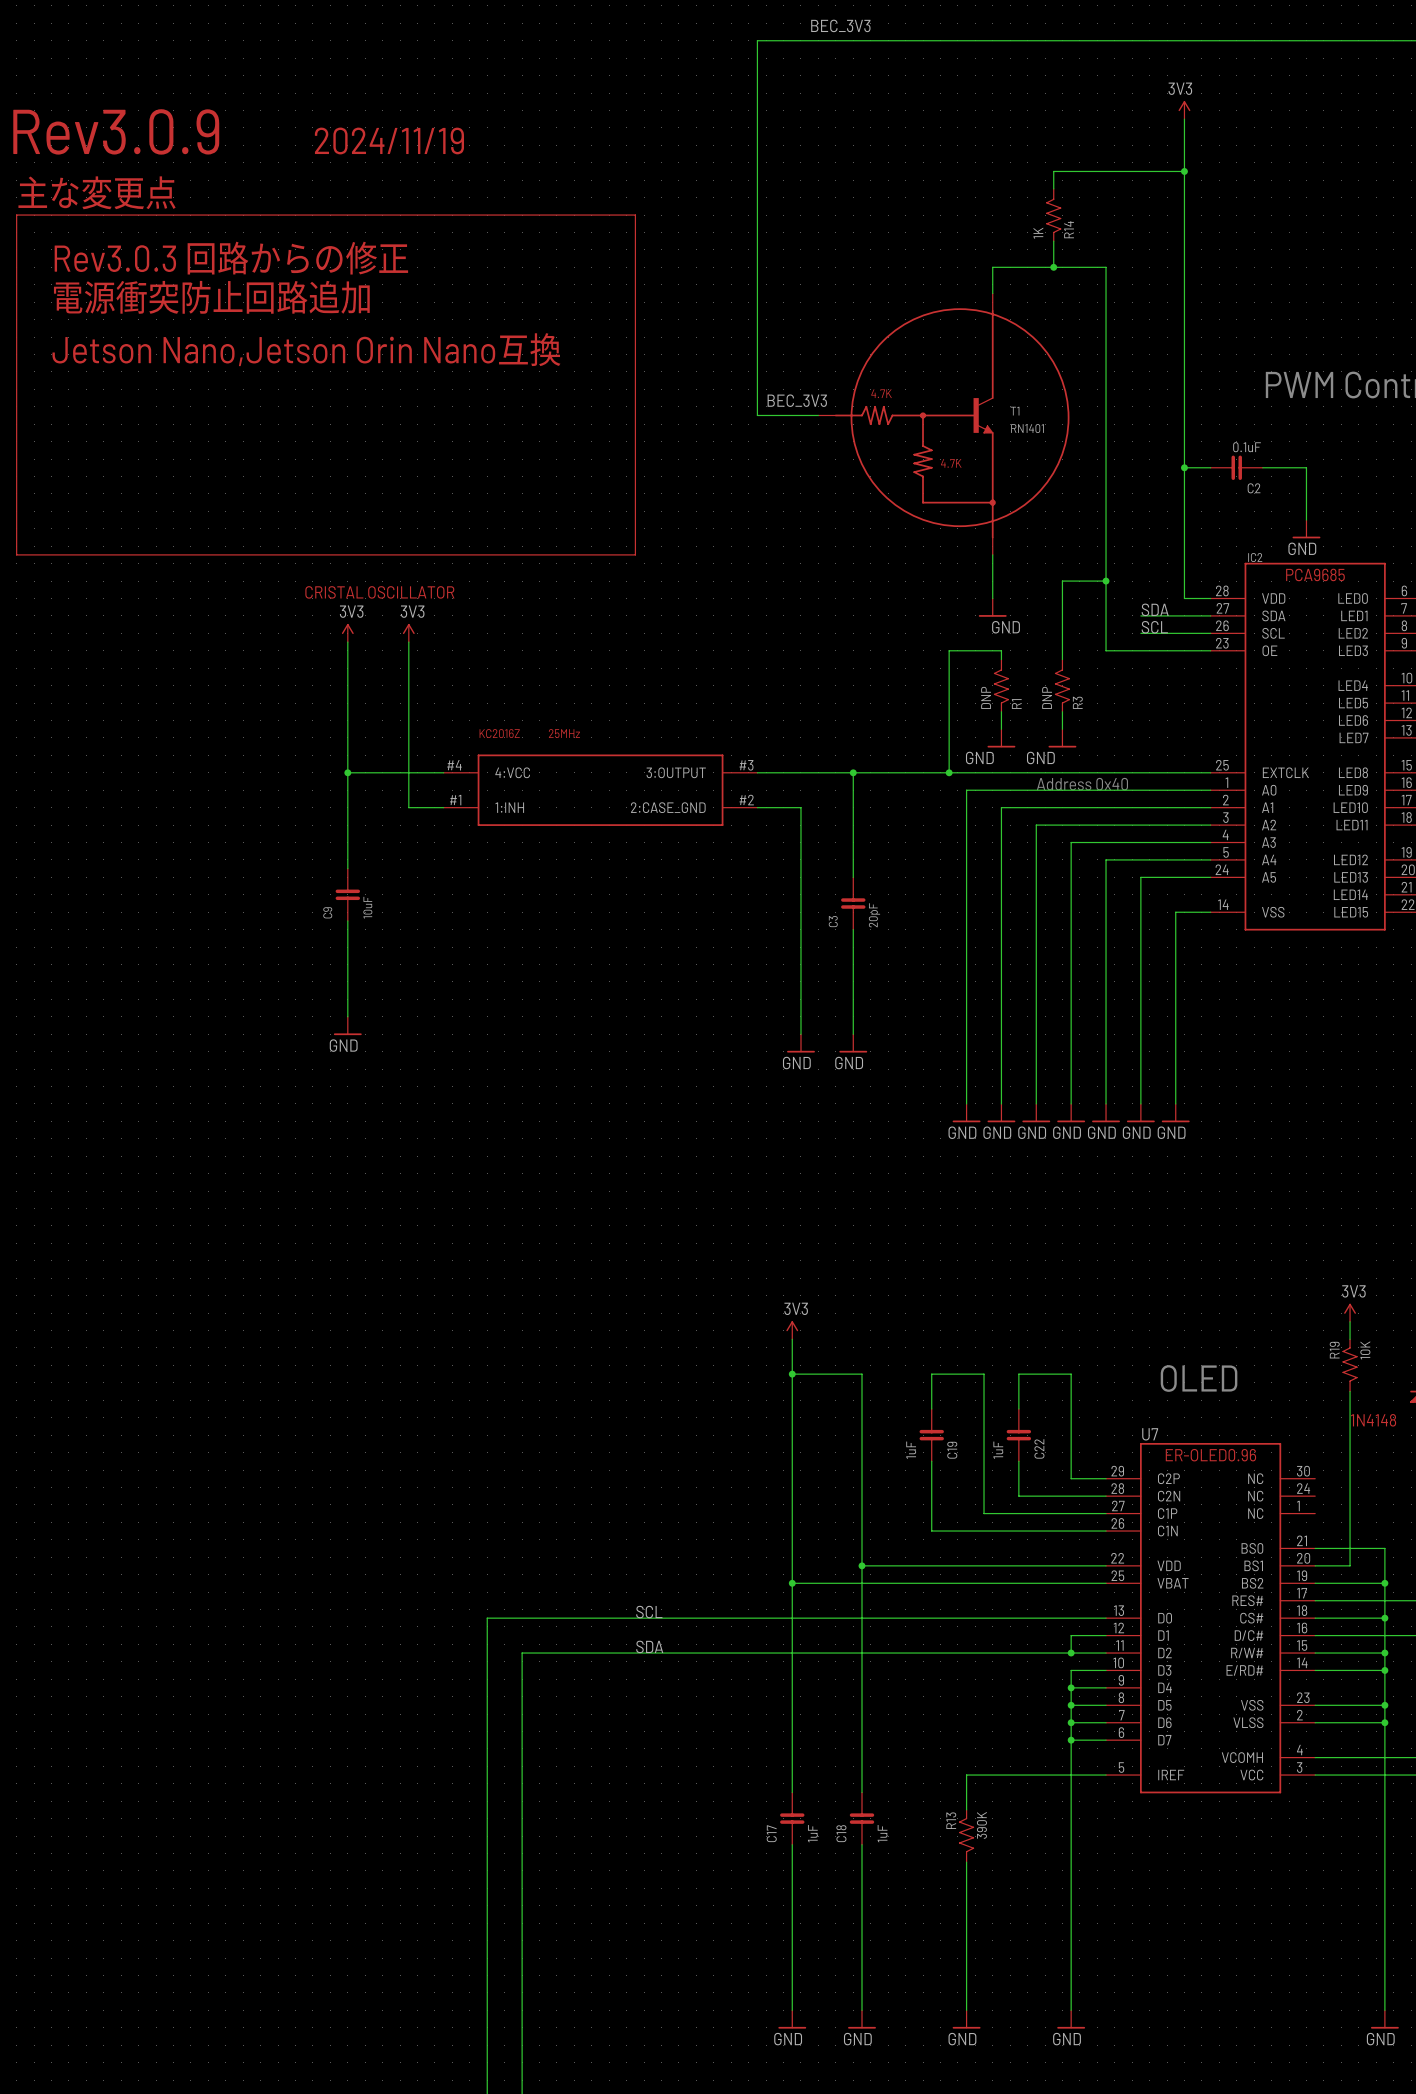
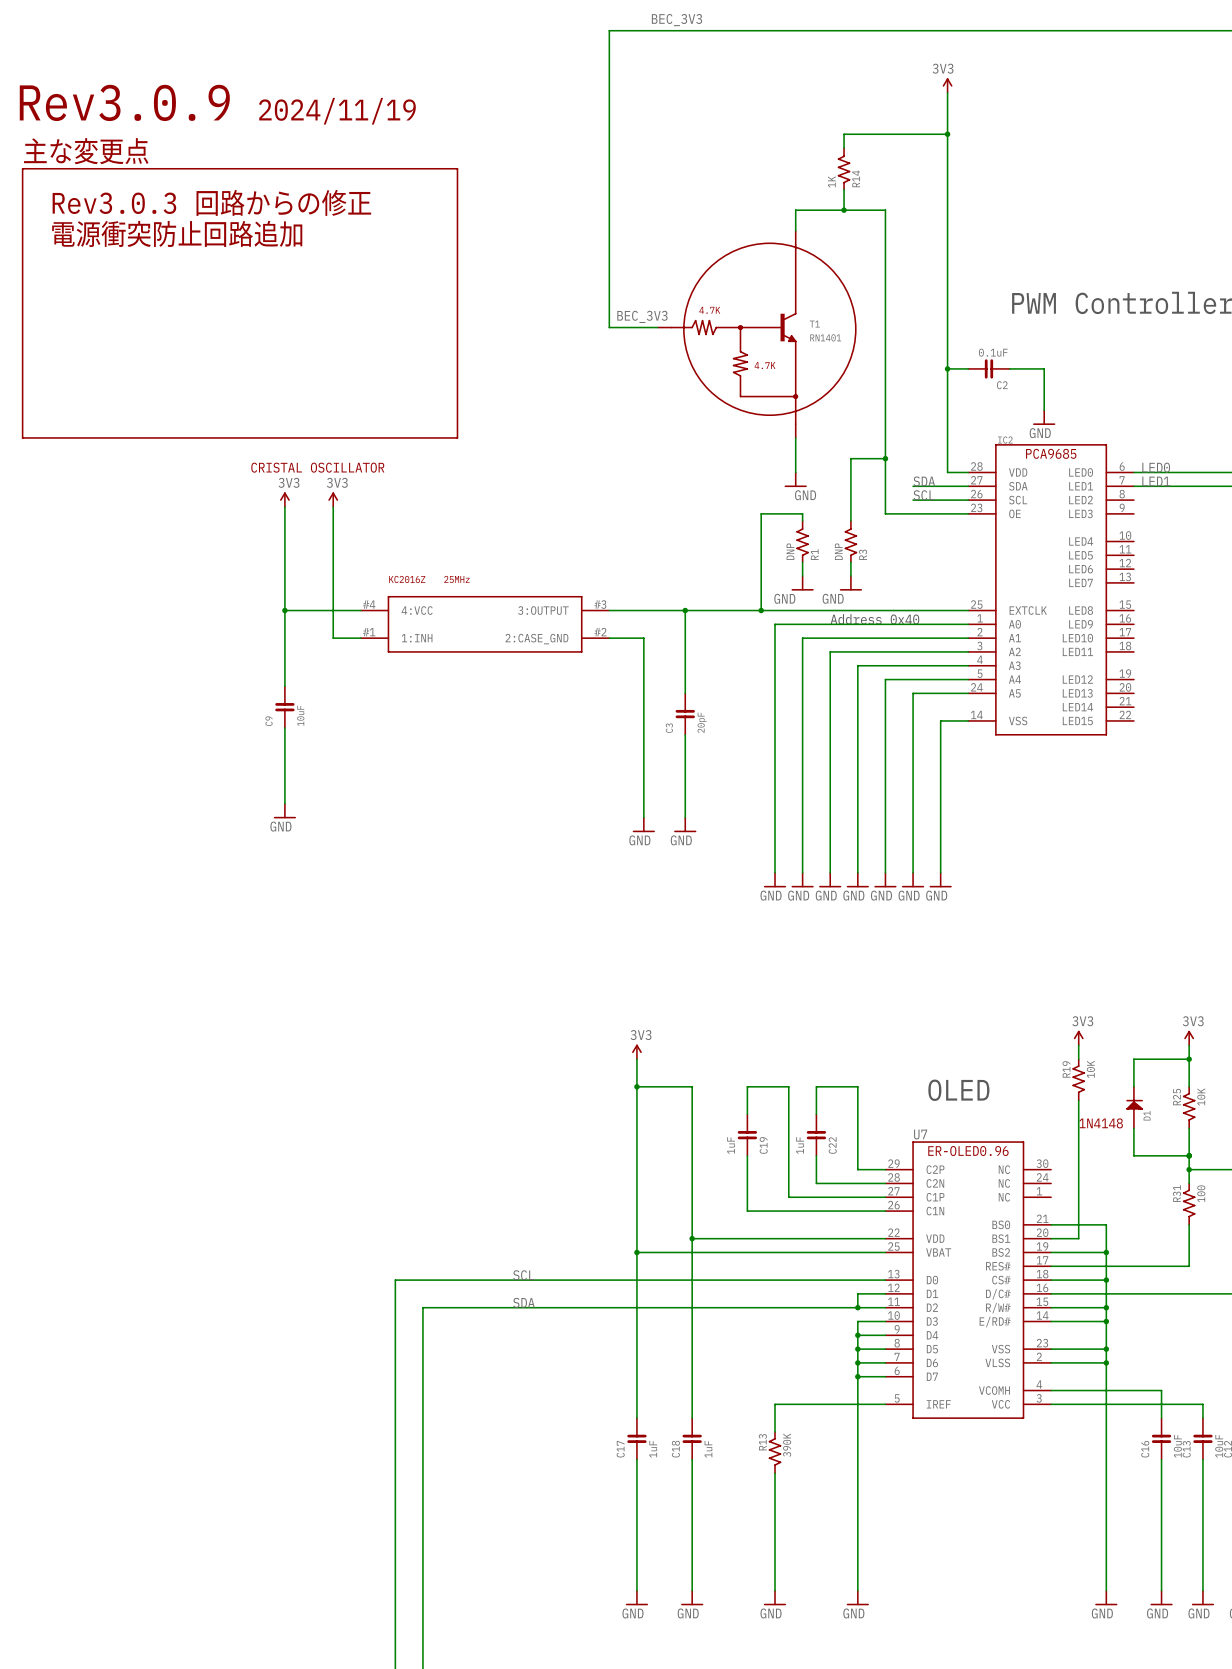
line: (565, 215) (635, 215) (635, 554) (565, 554) -> (457, 168) (457, 437)
text: Jetson Nano,Jetson Orin Nano互換 (306, 349) -> none

